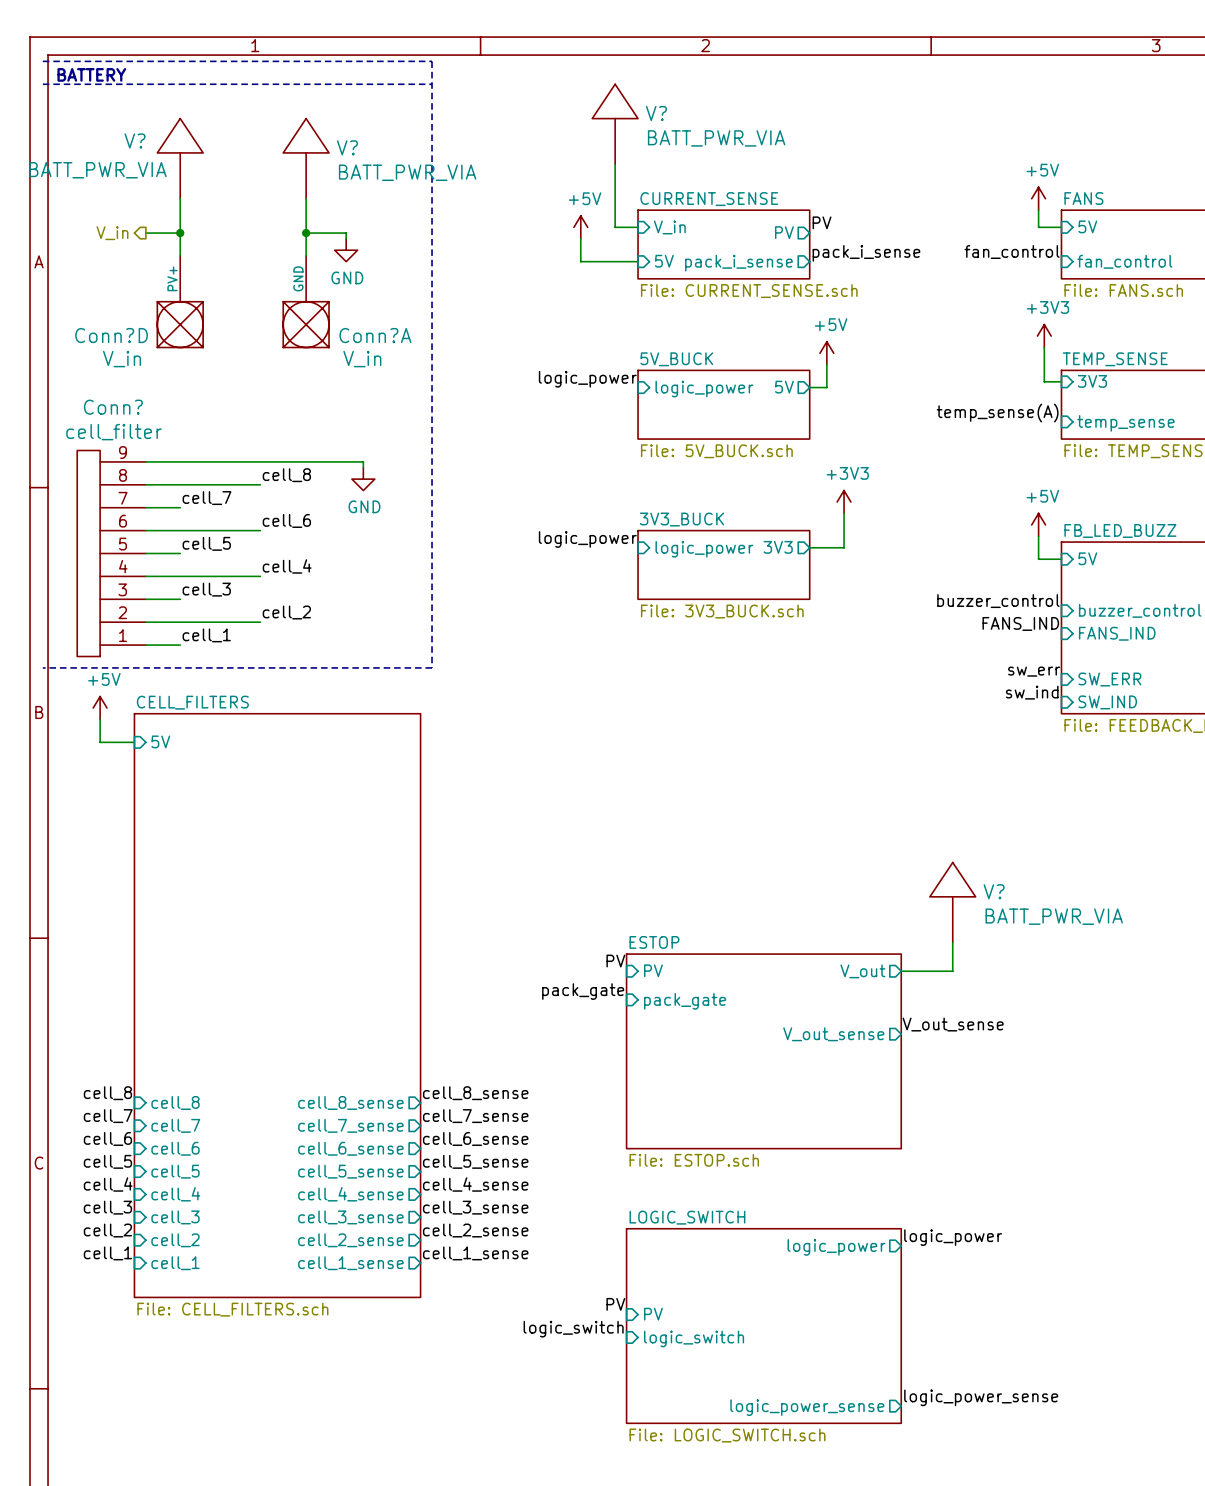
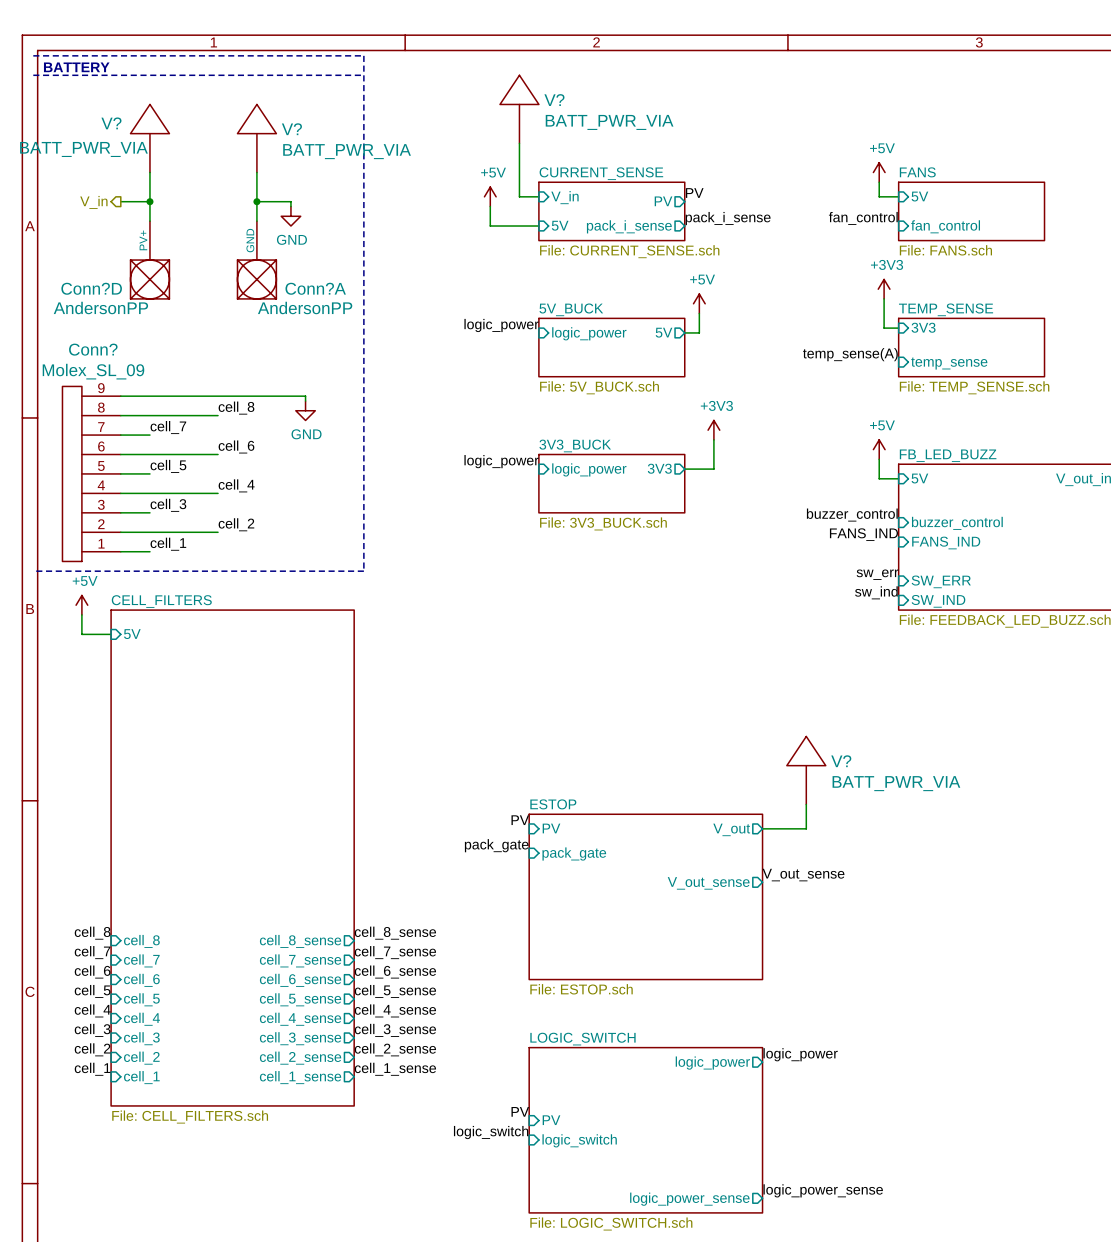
Conn?D value: V_in (122, 359) -> AndersonPP (100, 307)
Conn?A value: V_in (362, 359) -> AndersonPP (305, 307)
Conn? value: cell_filter (114, 432) -> Molex_SL_09 (93, 371)

